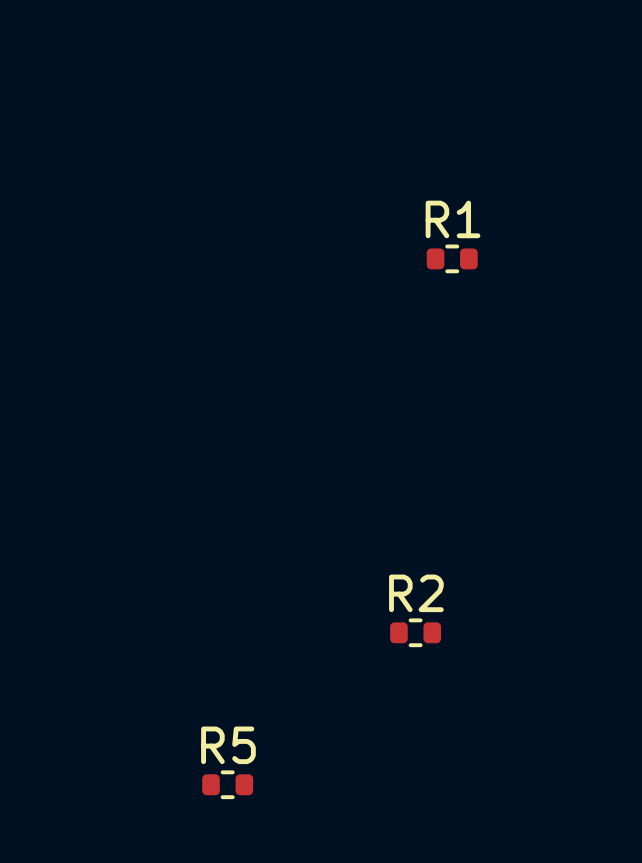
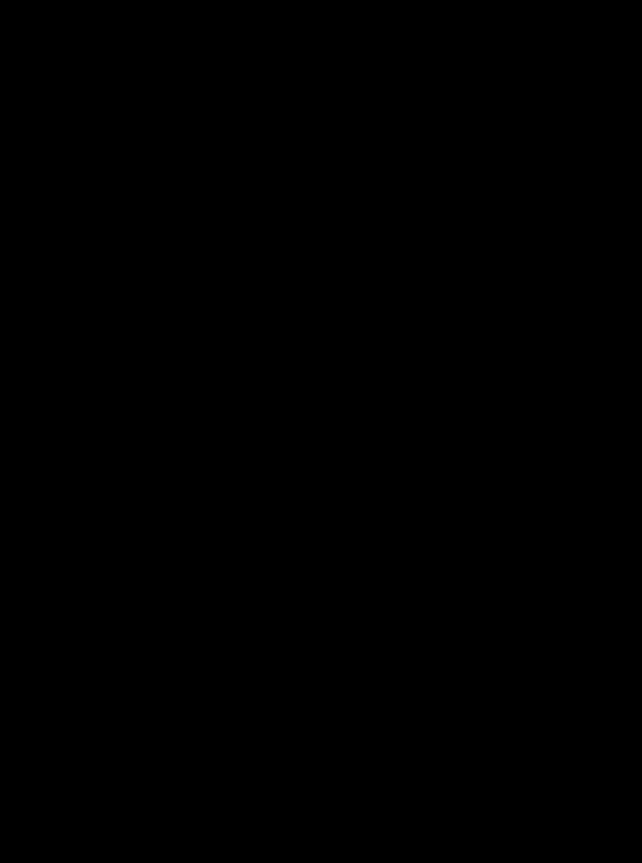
R1: (452, 258) -> none
R2: (415, 632) -> none
R5: (227, 784) -> none

